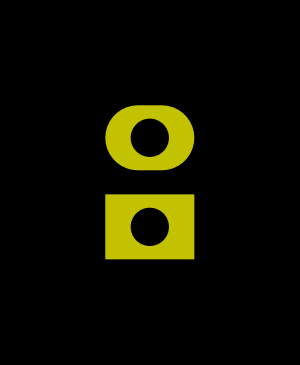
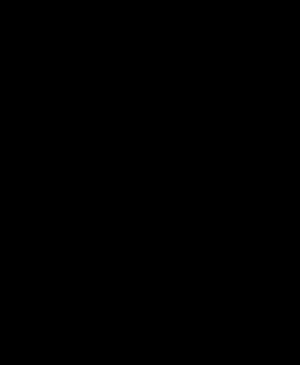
part: (149, 182) -> none

